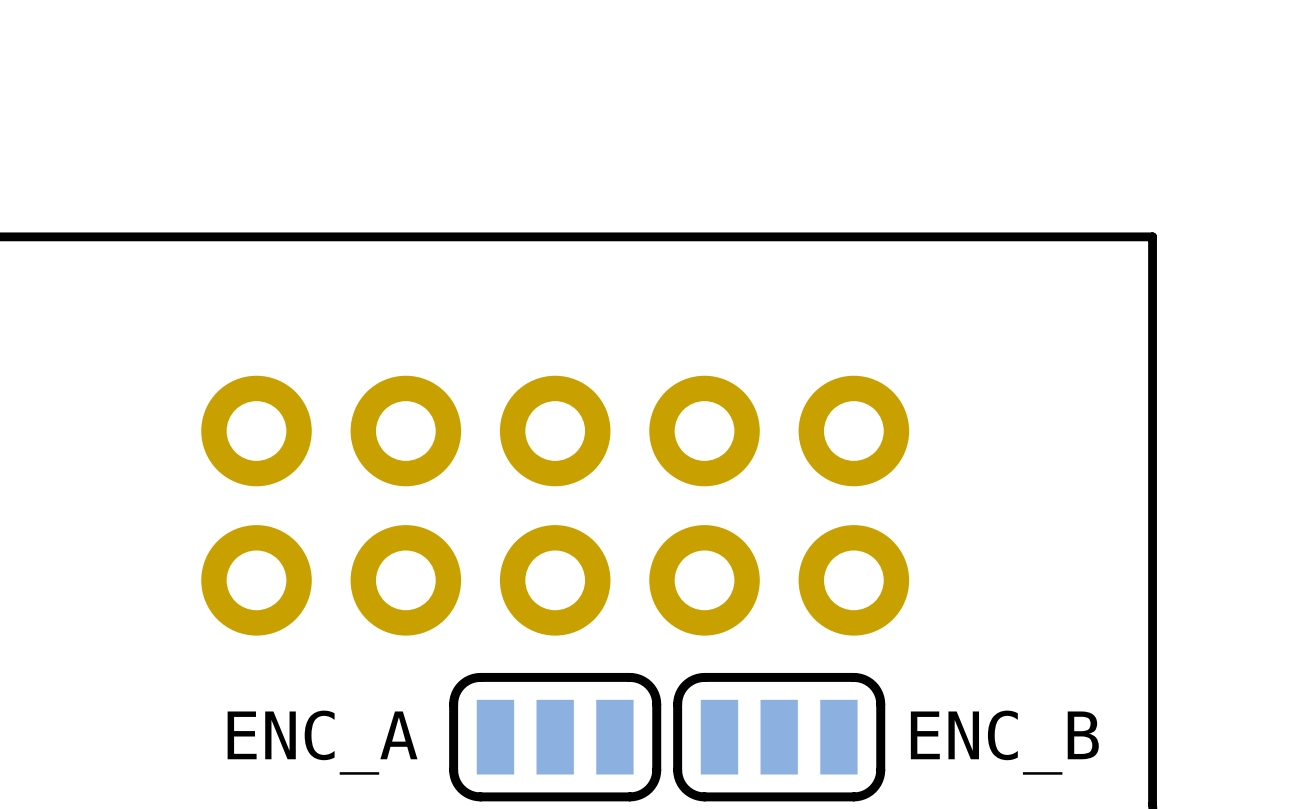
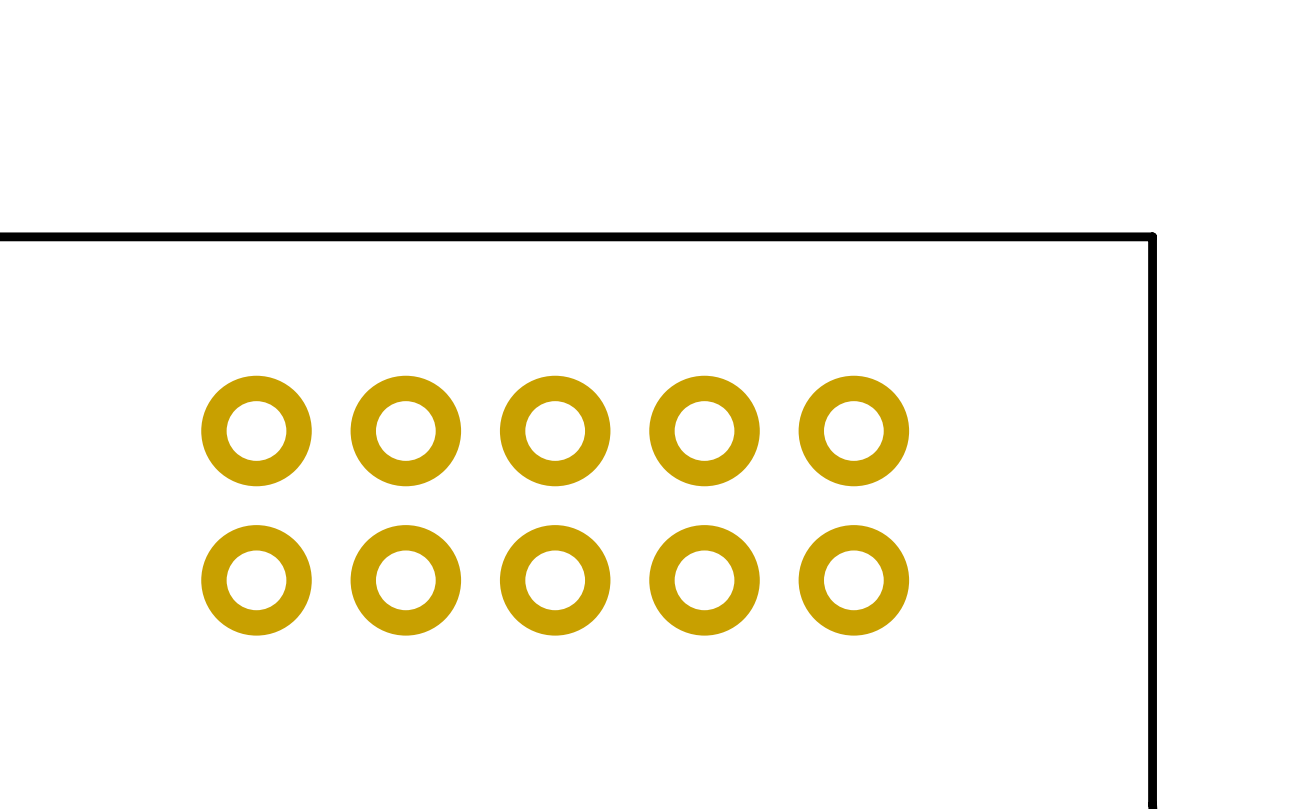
part: ENC_A (555, 737) -> none
part: ENC_B (779, 737) -> none

